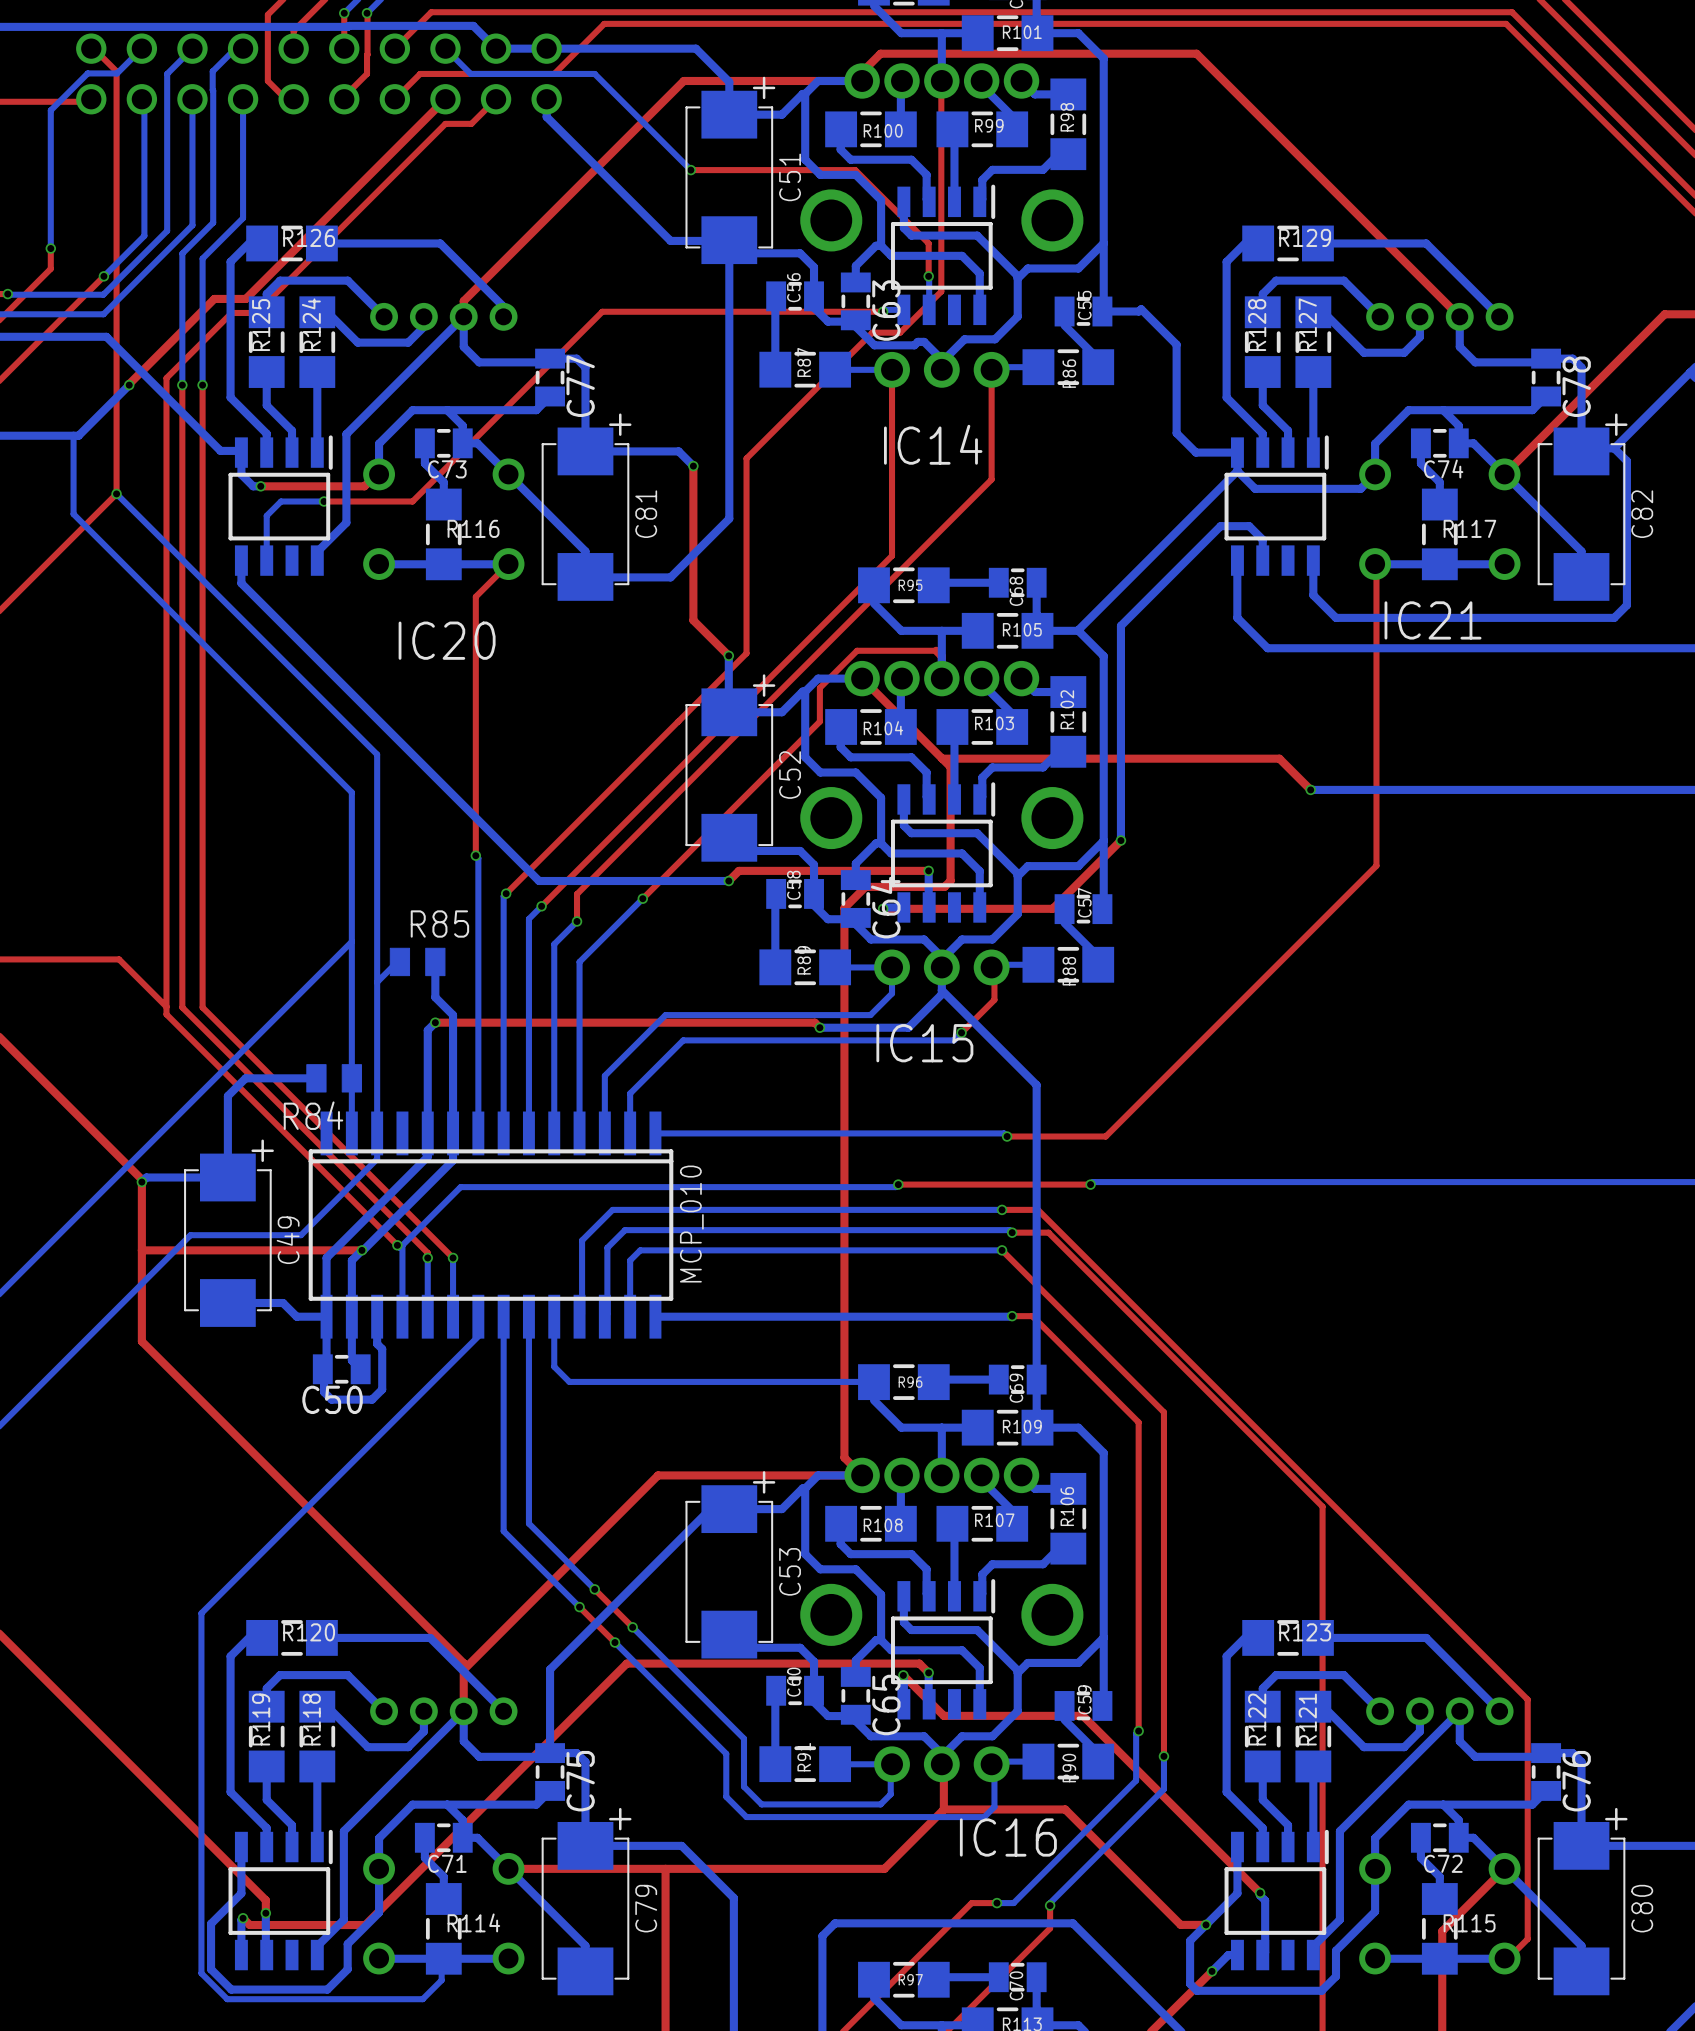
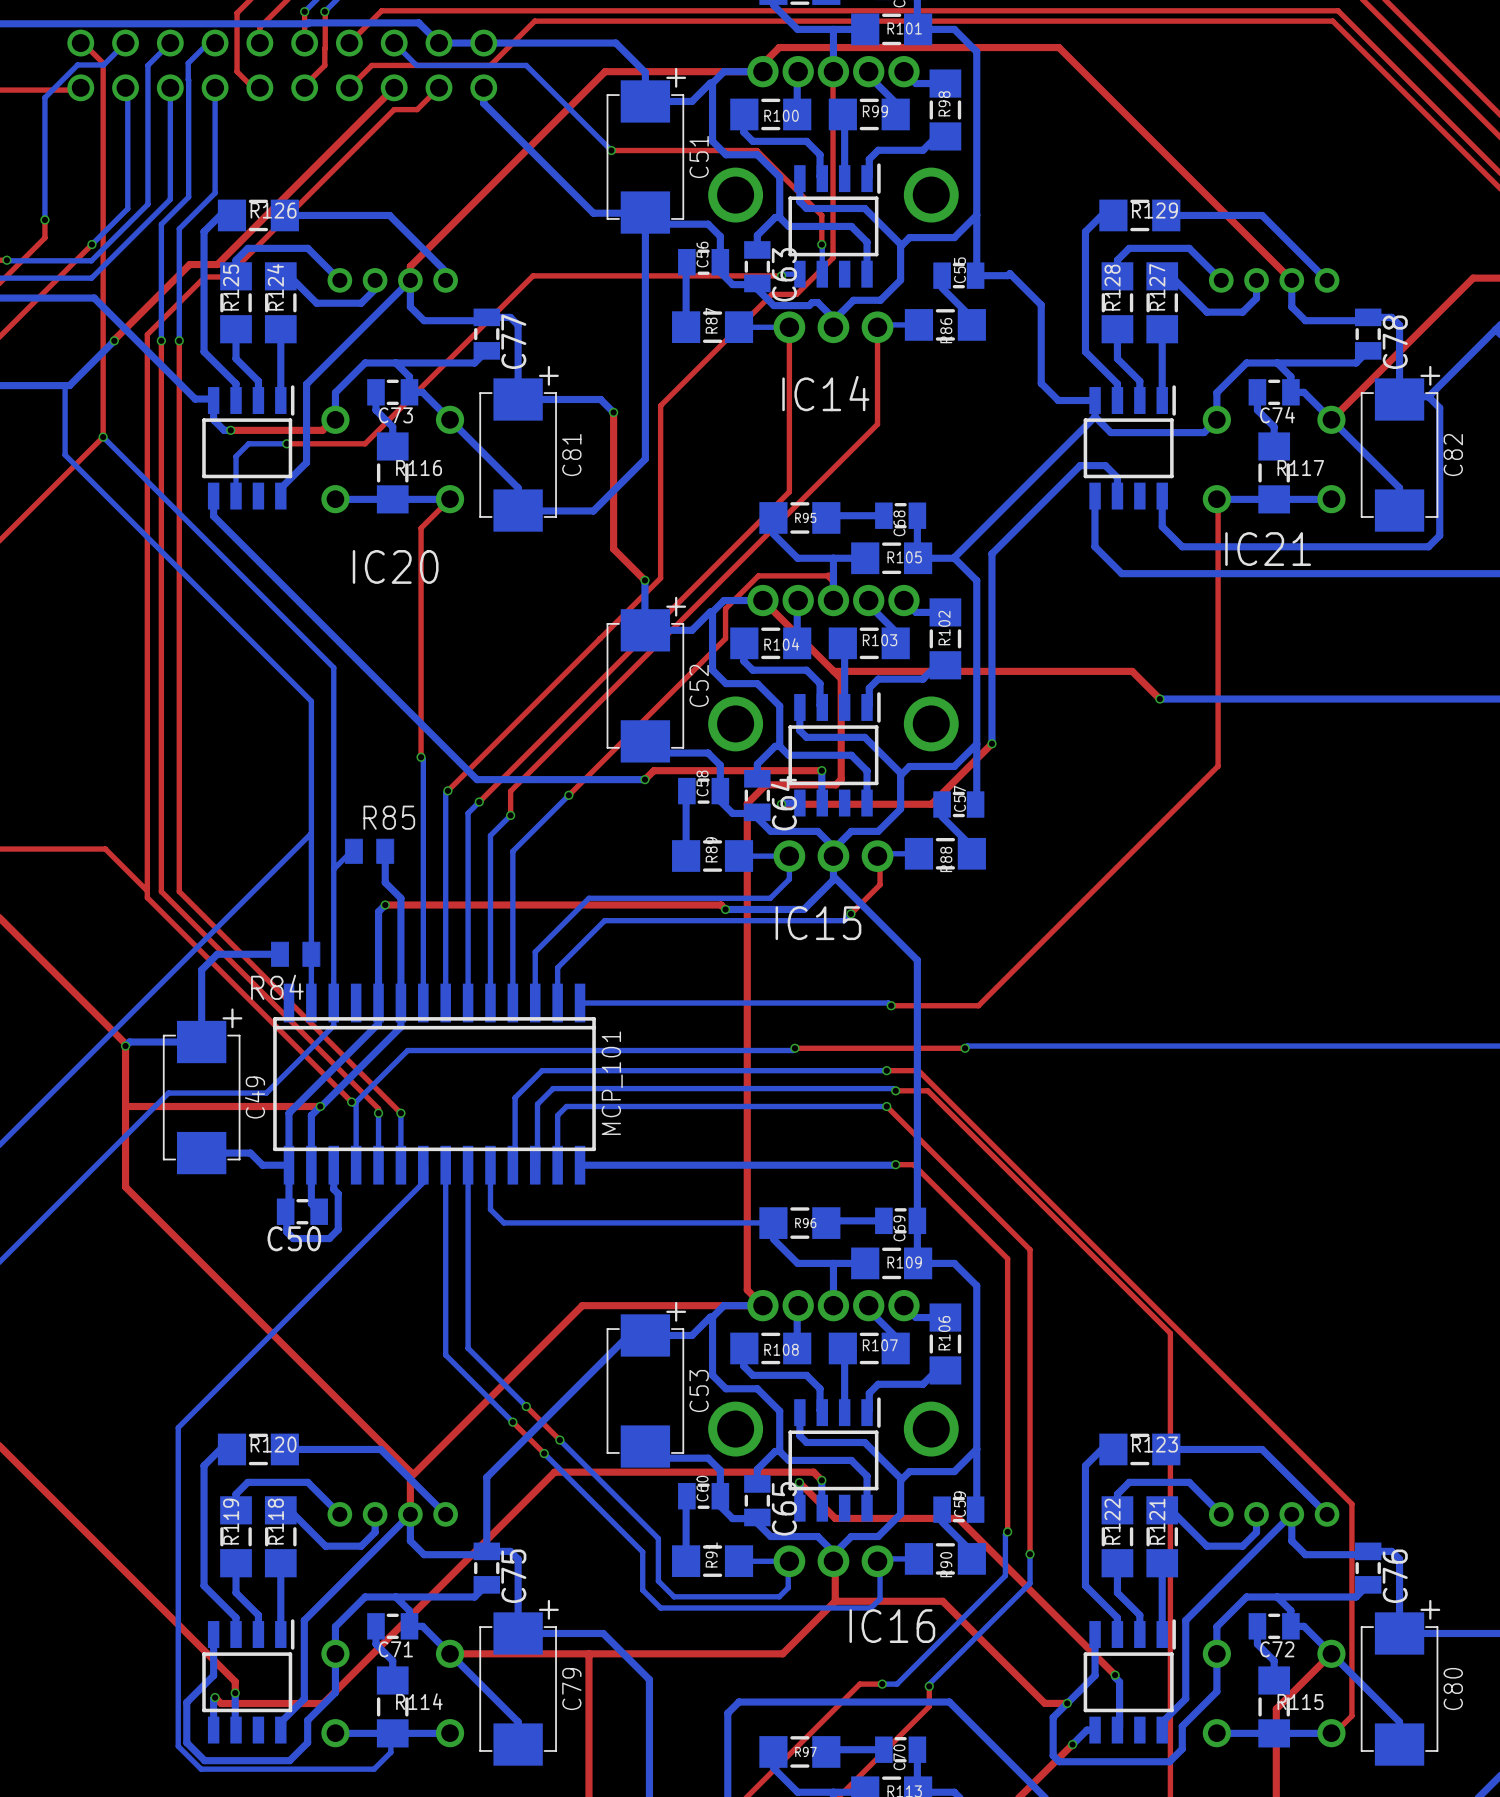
MCP_010 name: MCP_010 (691, 1224) -> MCP_101 (612, 1083)

